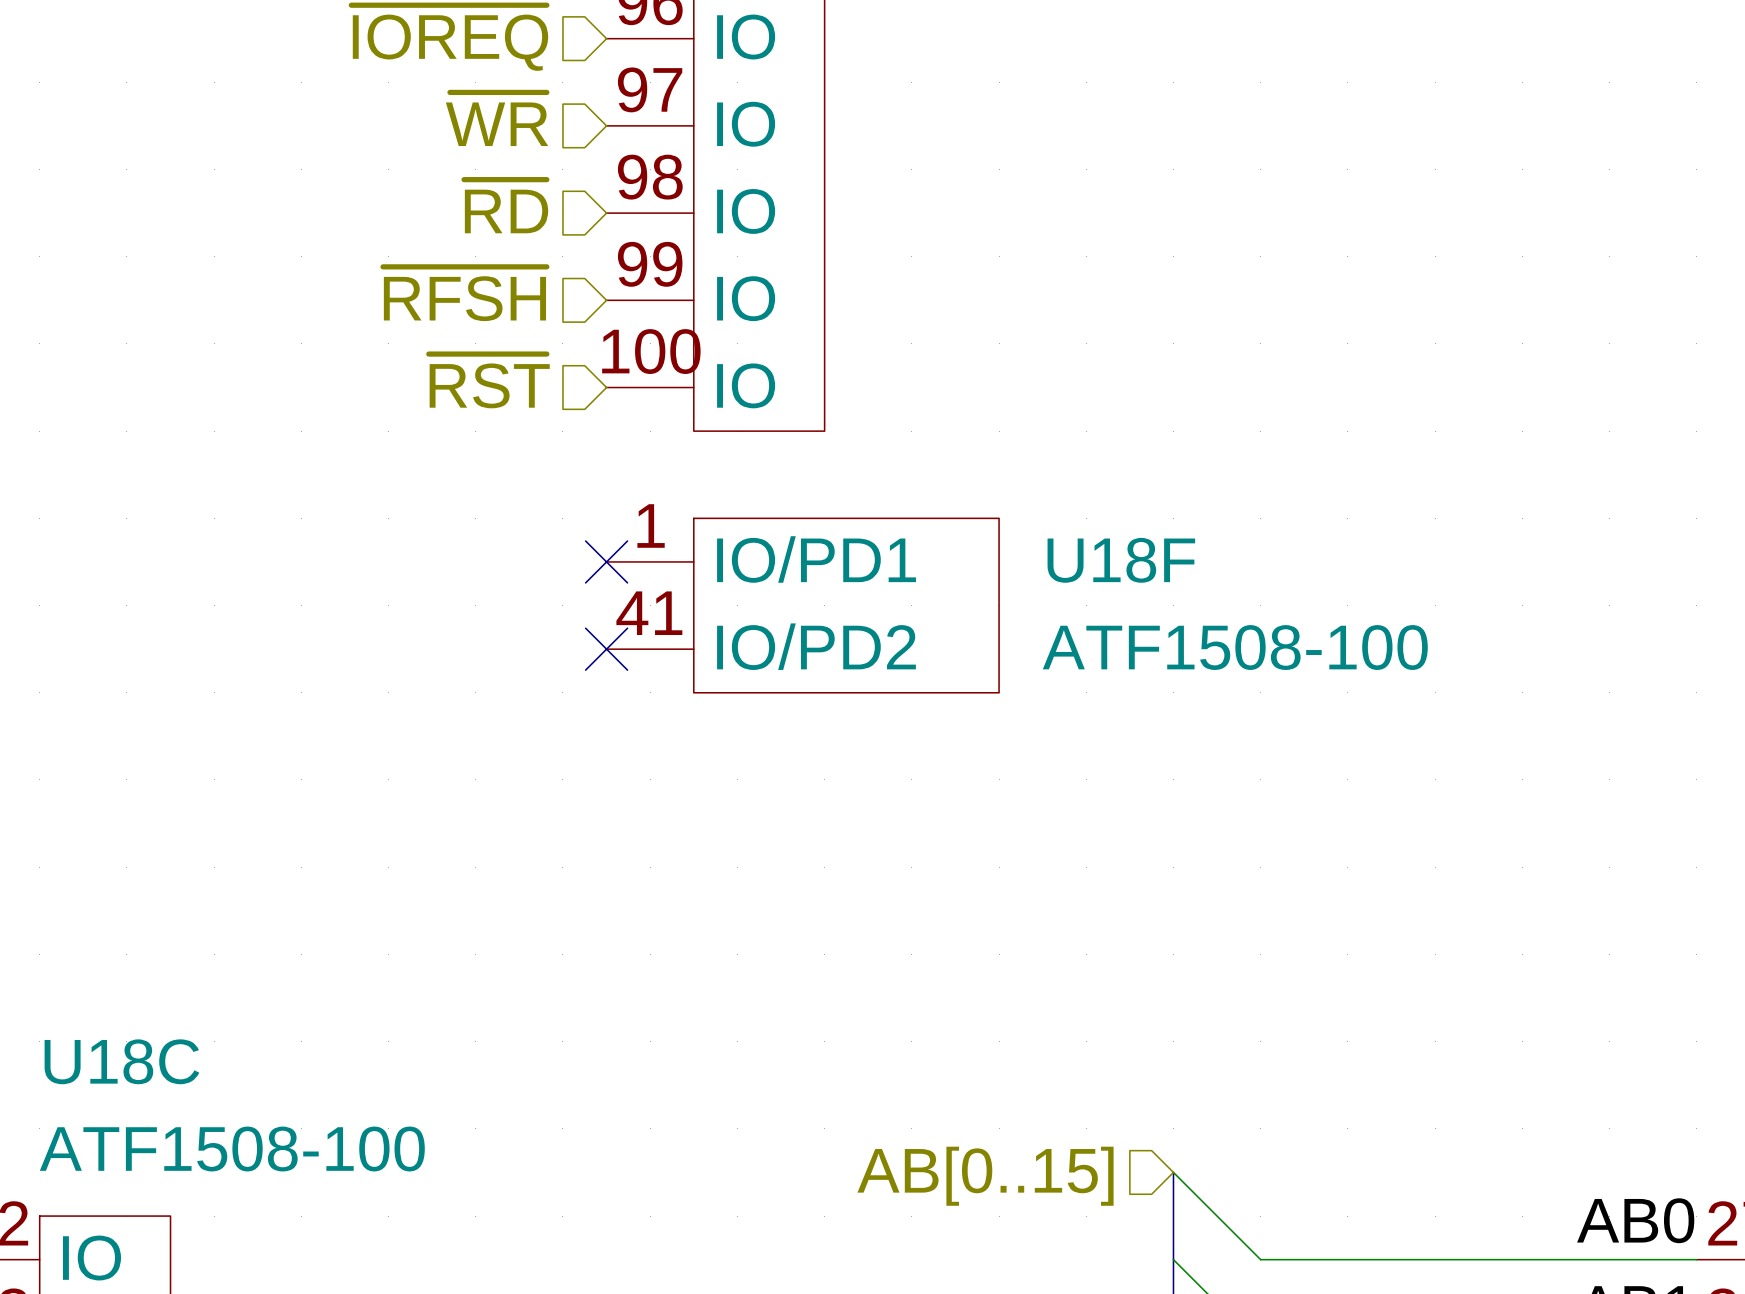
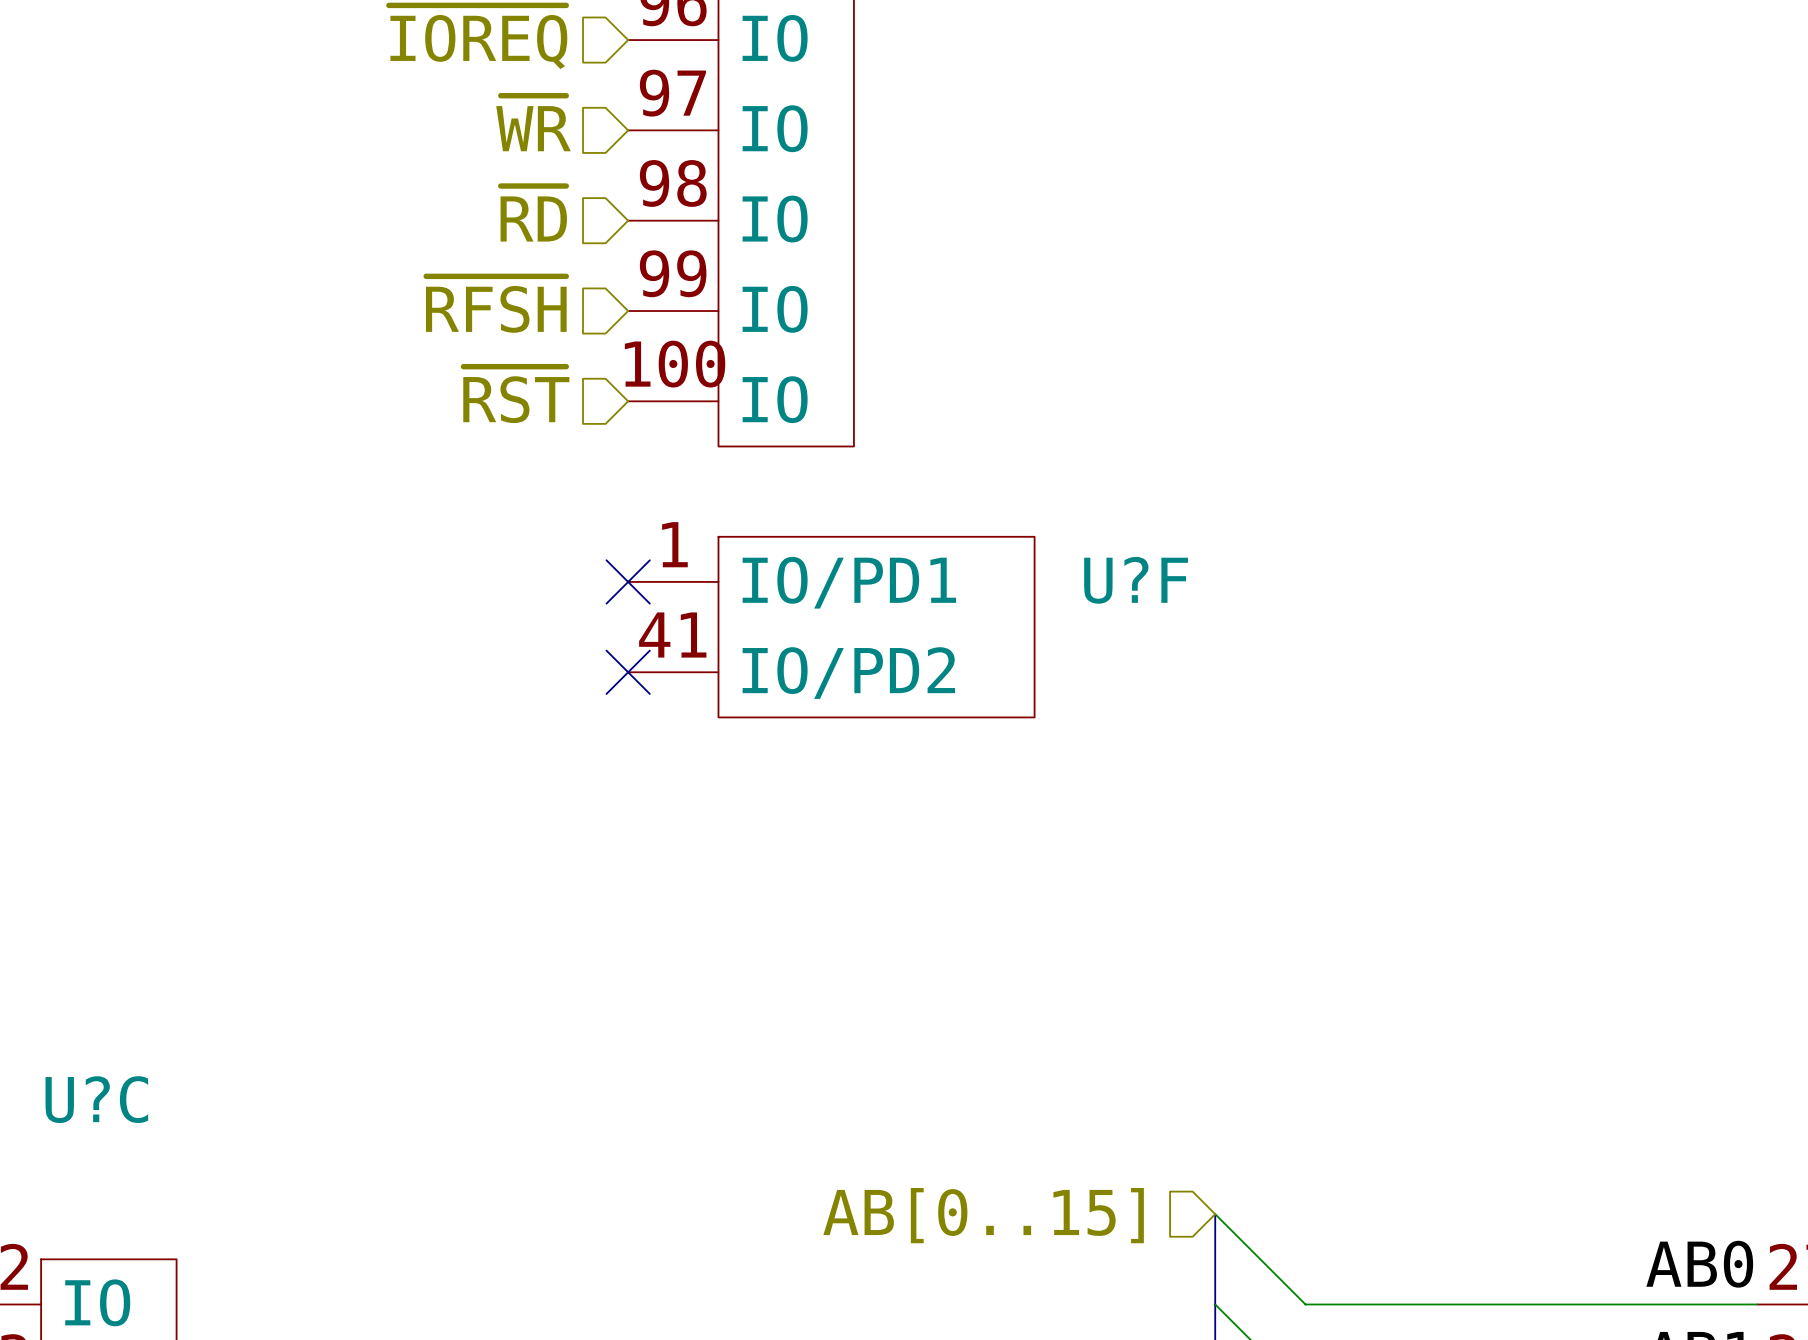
U18F name: U18F (1121, 560) -> U?F (1136, 580)
U18F value: ATF1508-100 (1235, 647) -> none
U18C name: U18C (121, 1061) -> U?C (96, 1099)
U18C value: ATF1508-100 (232, 1149) -> none

